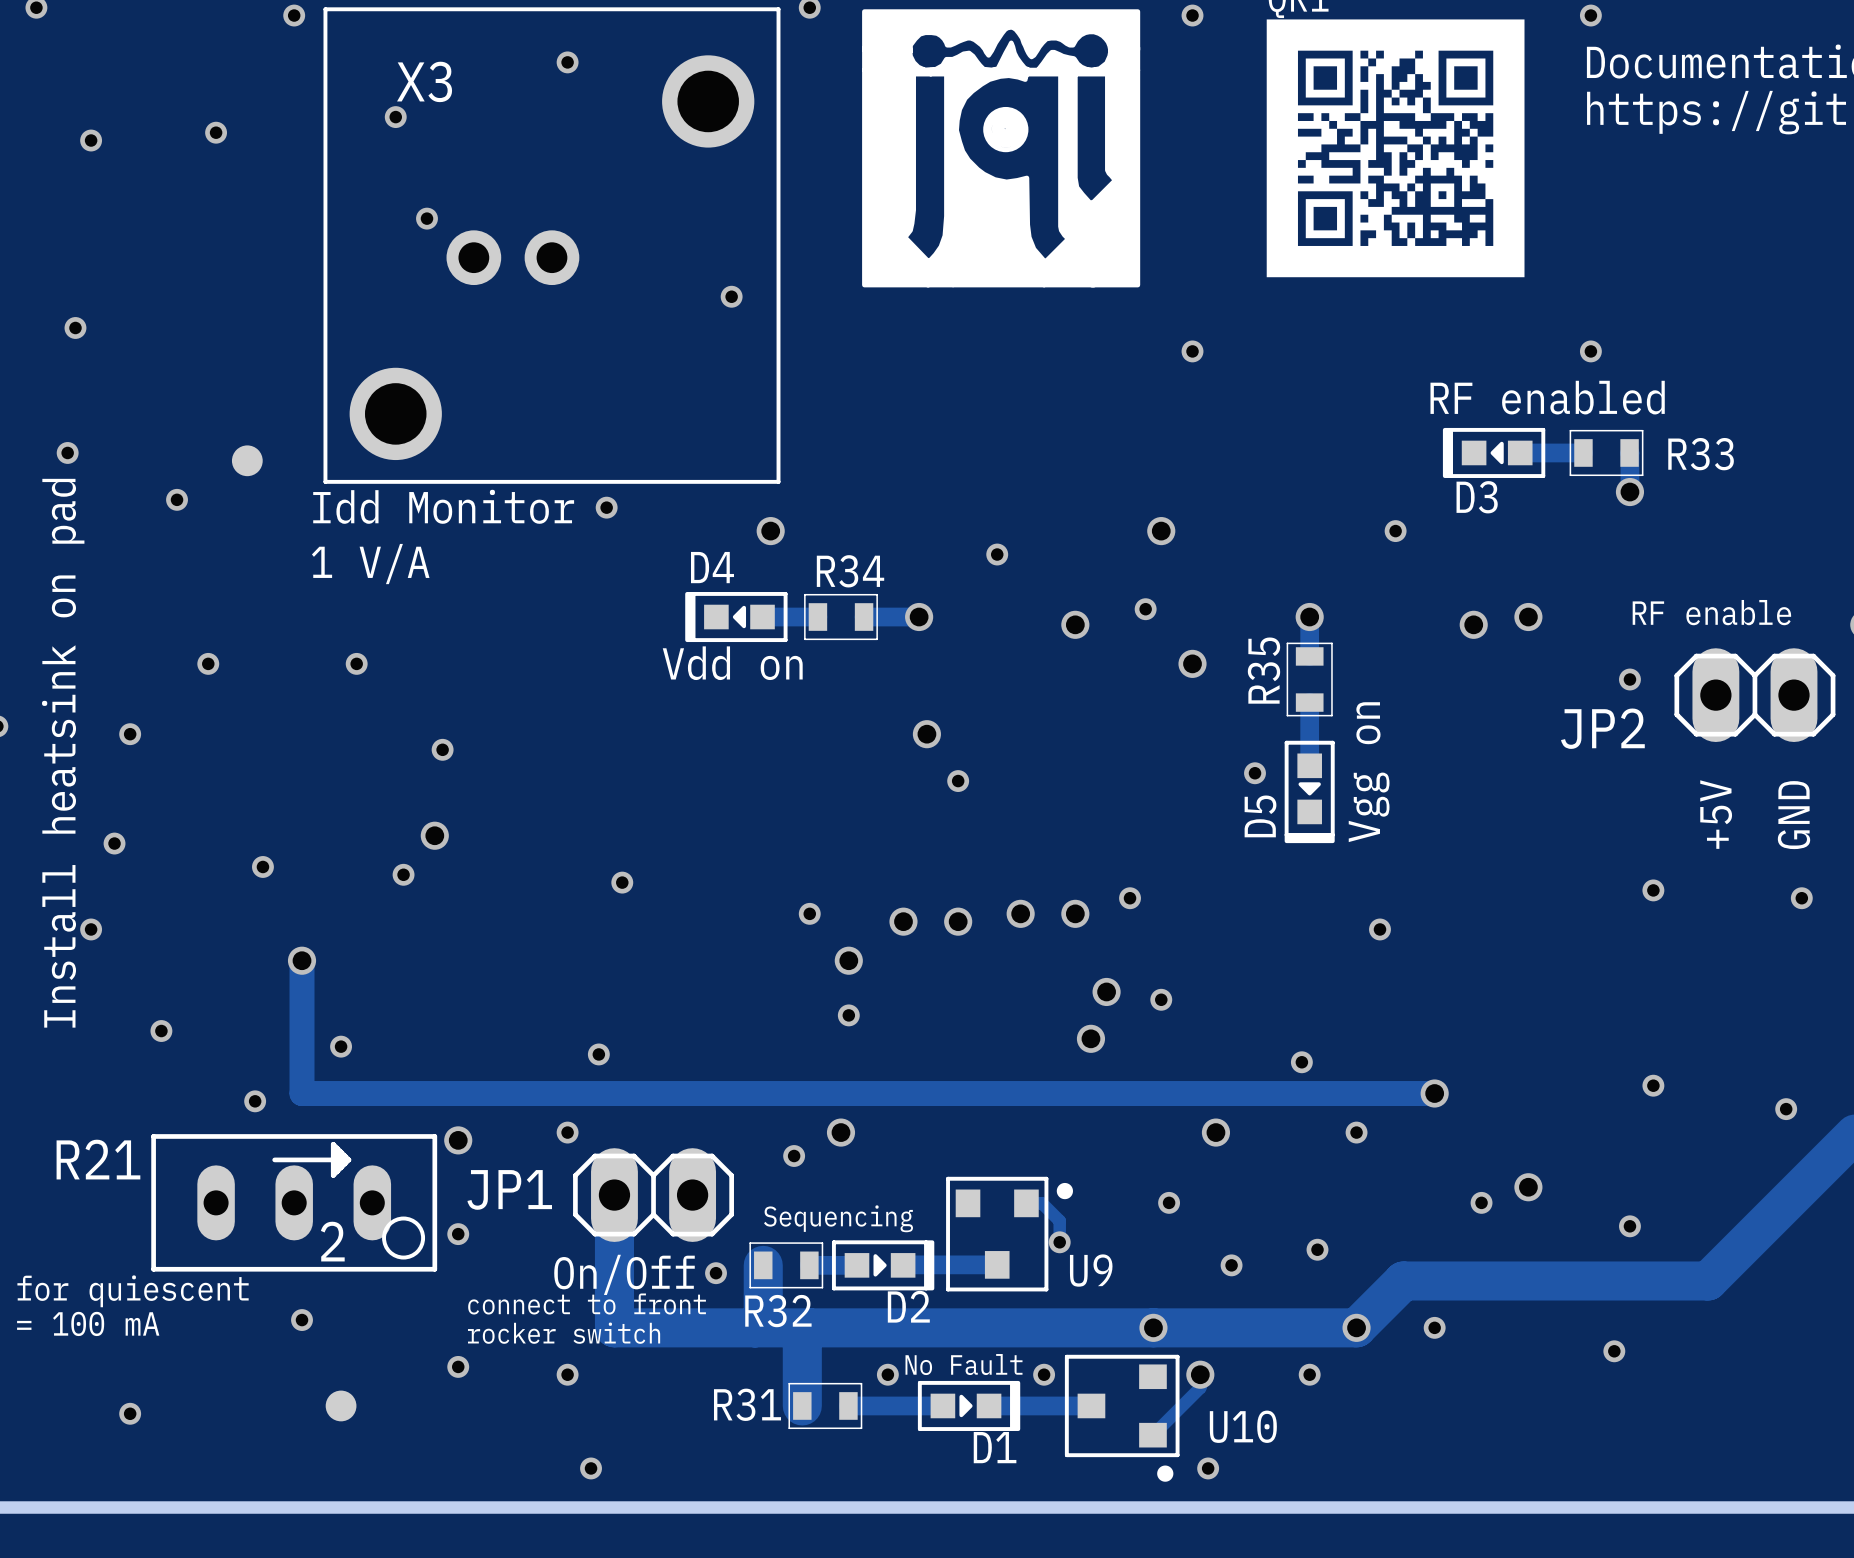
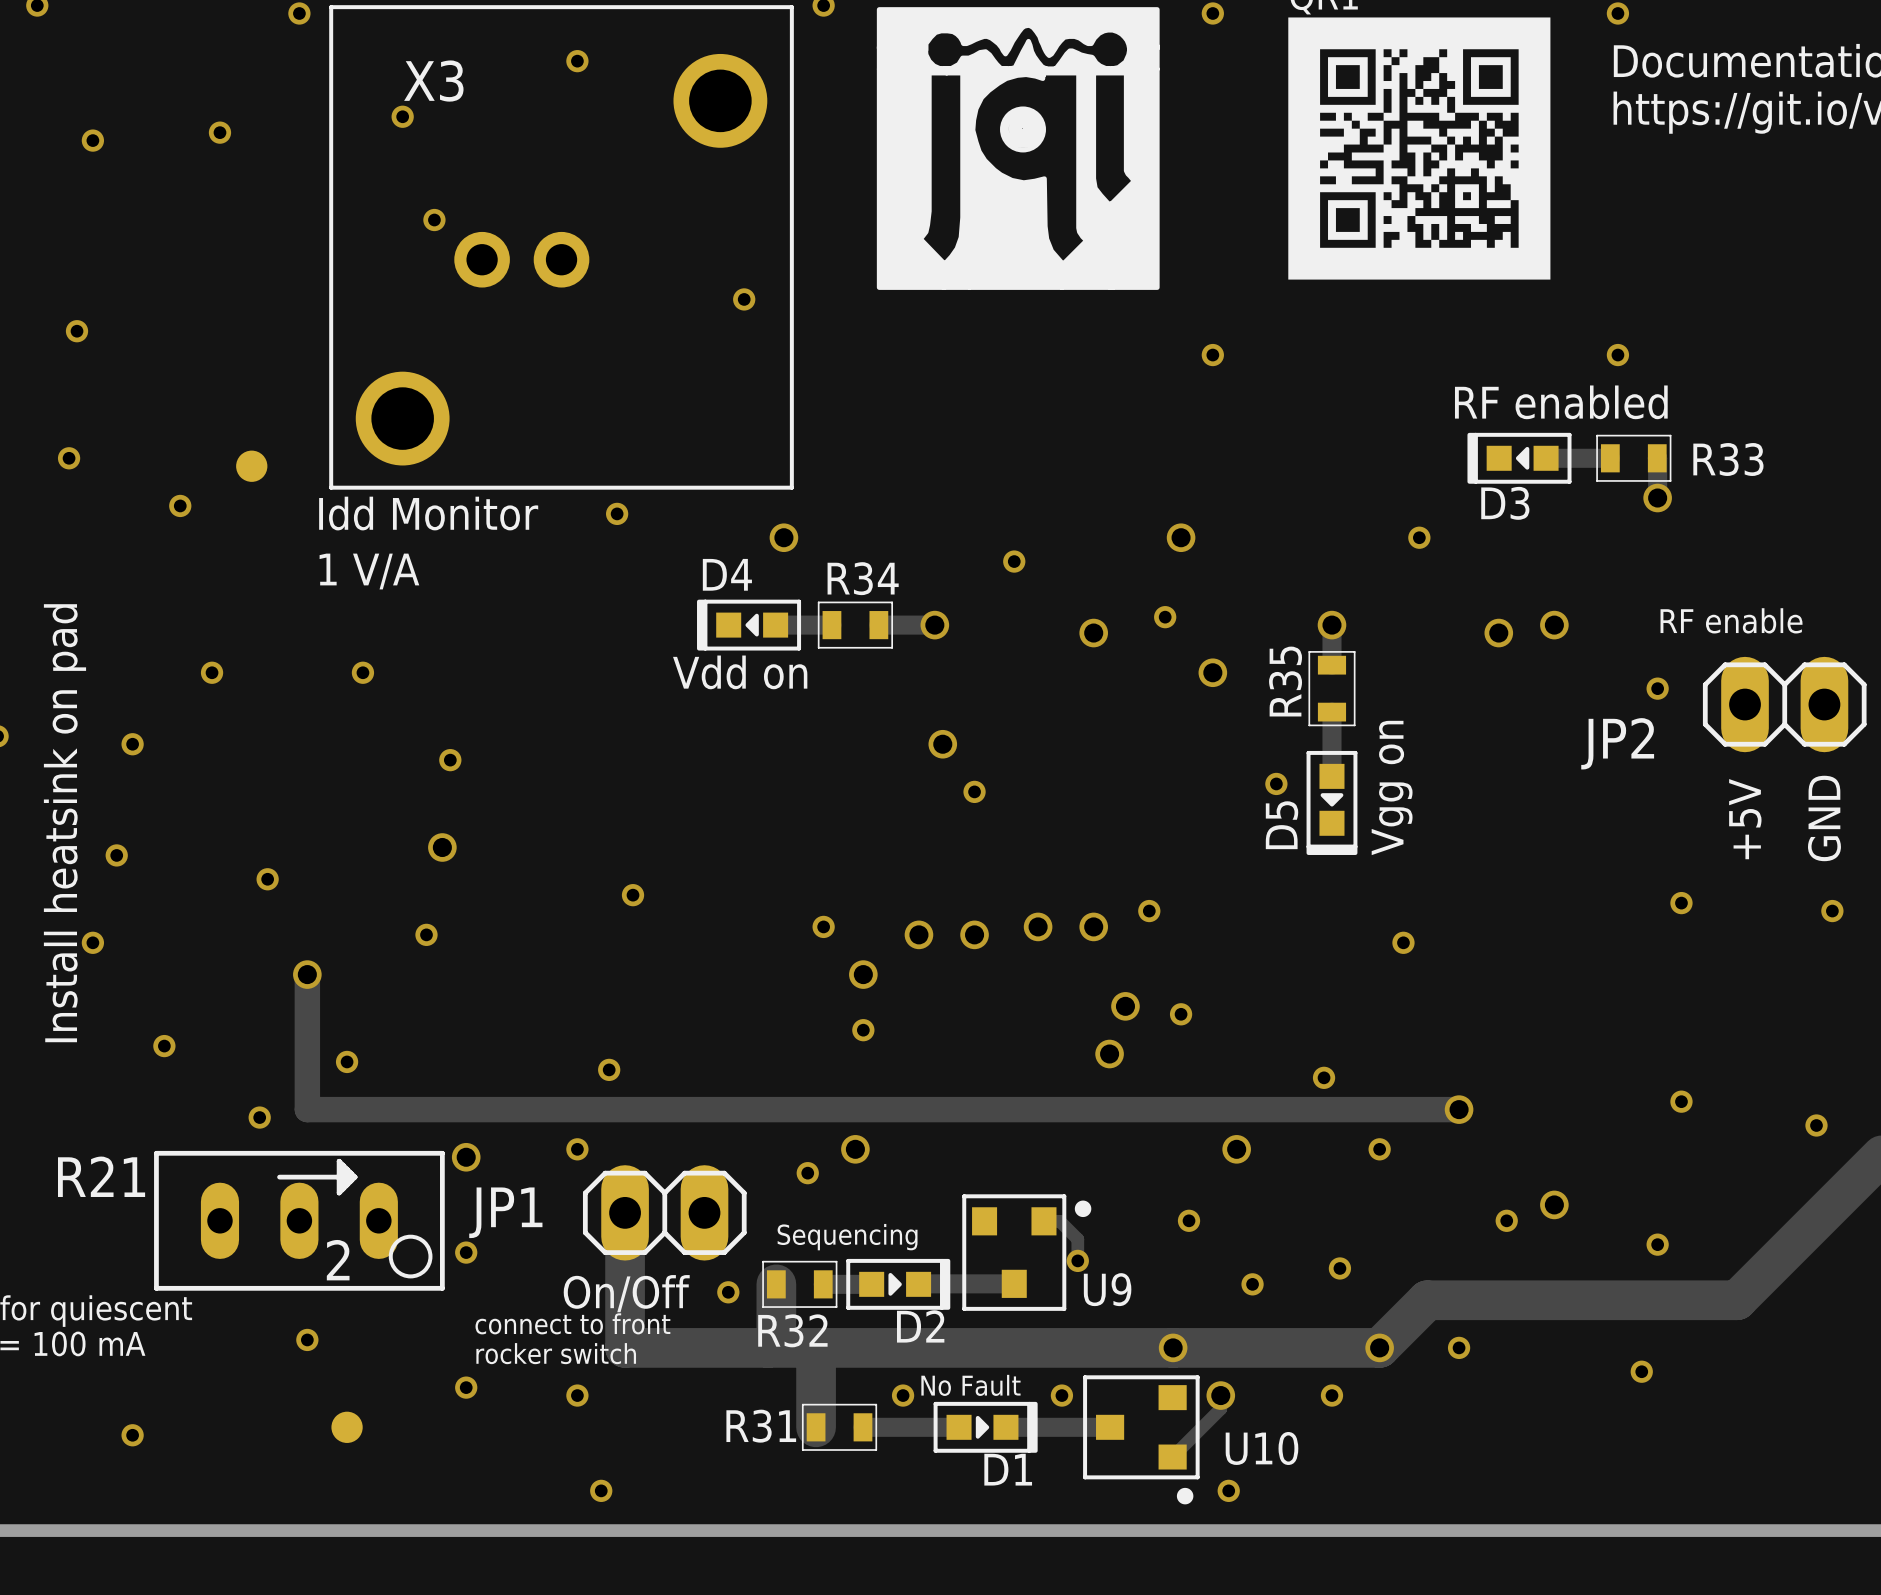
via position: (403, 874) -> (426, 934)

